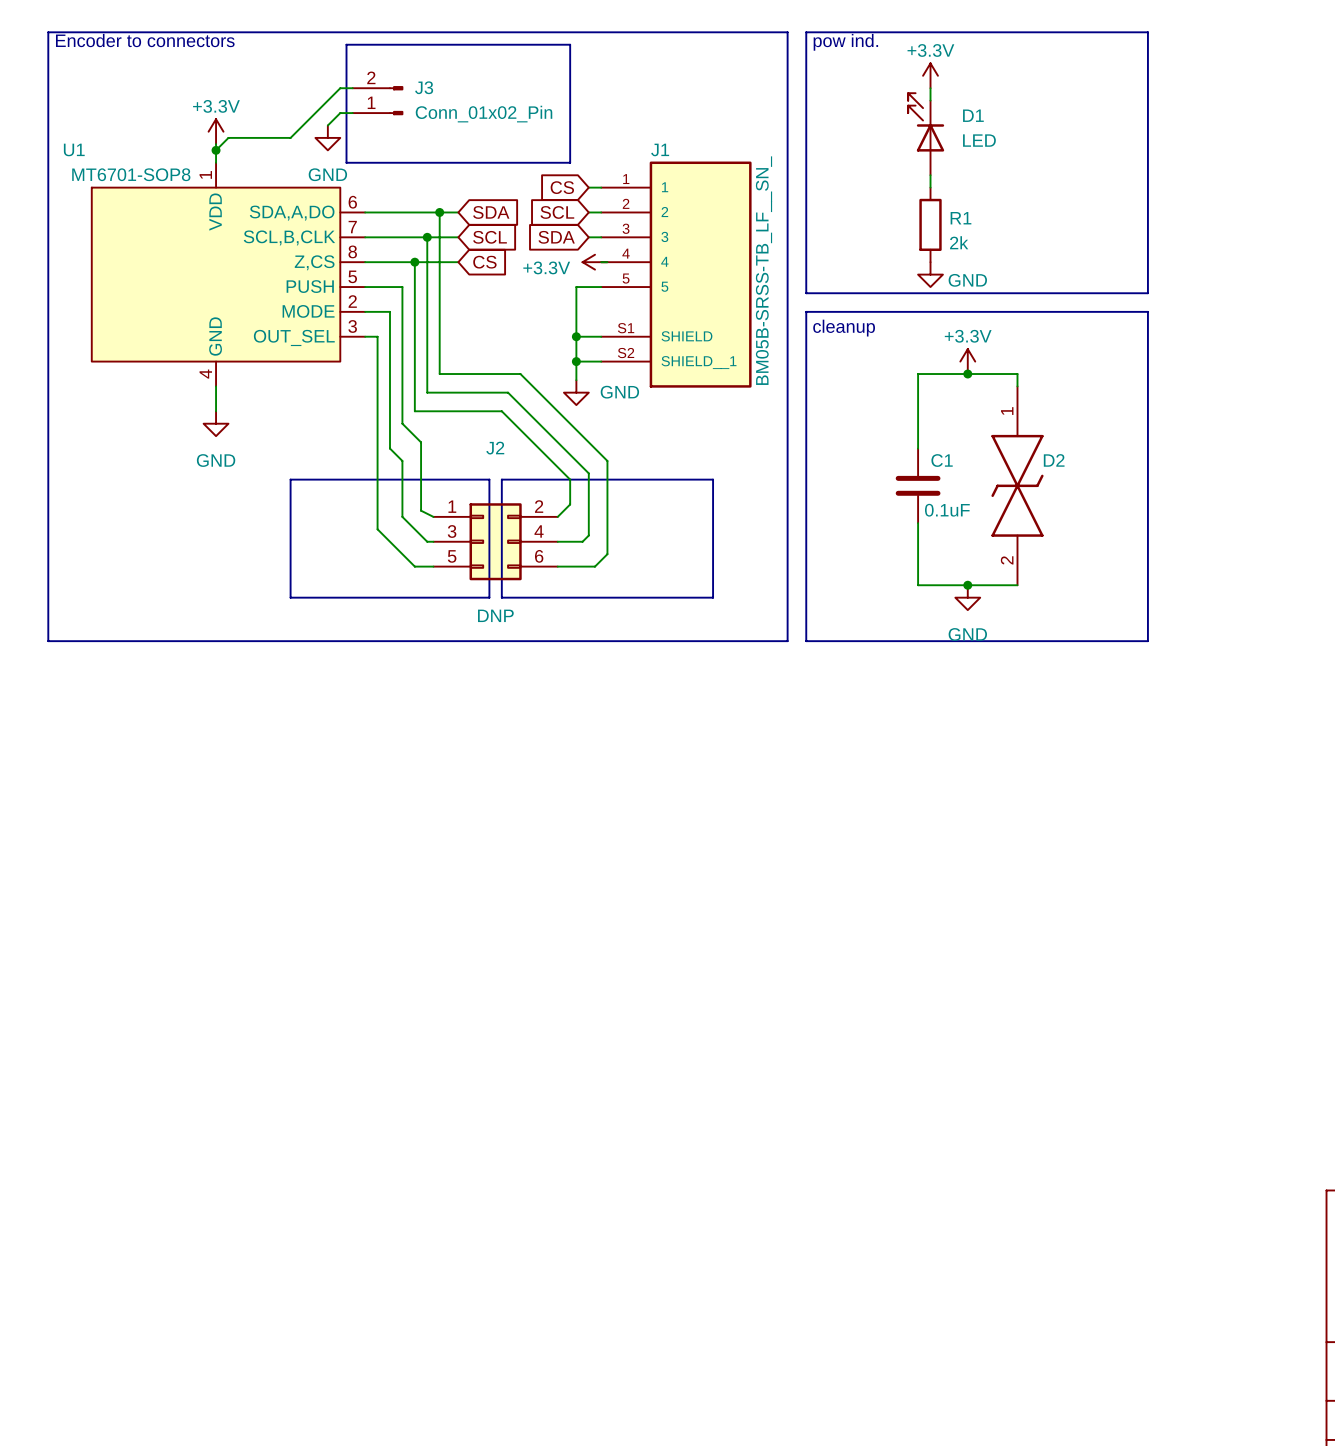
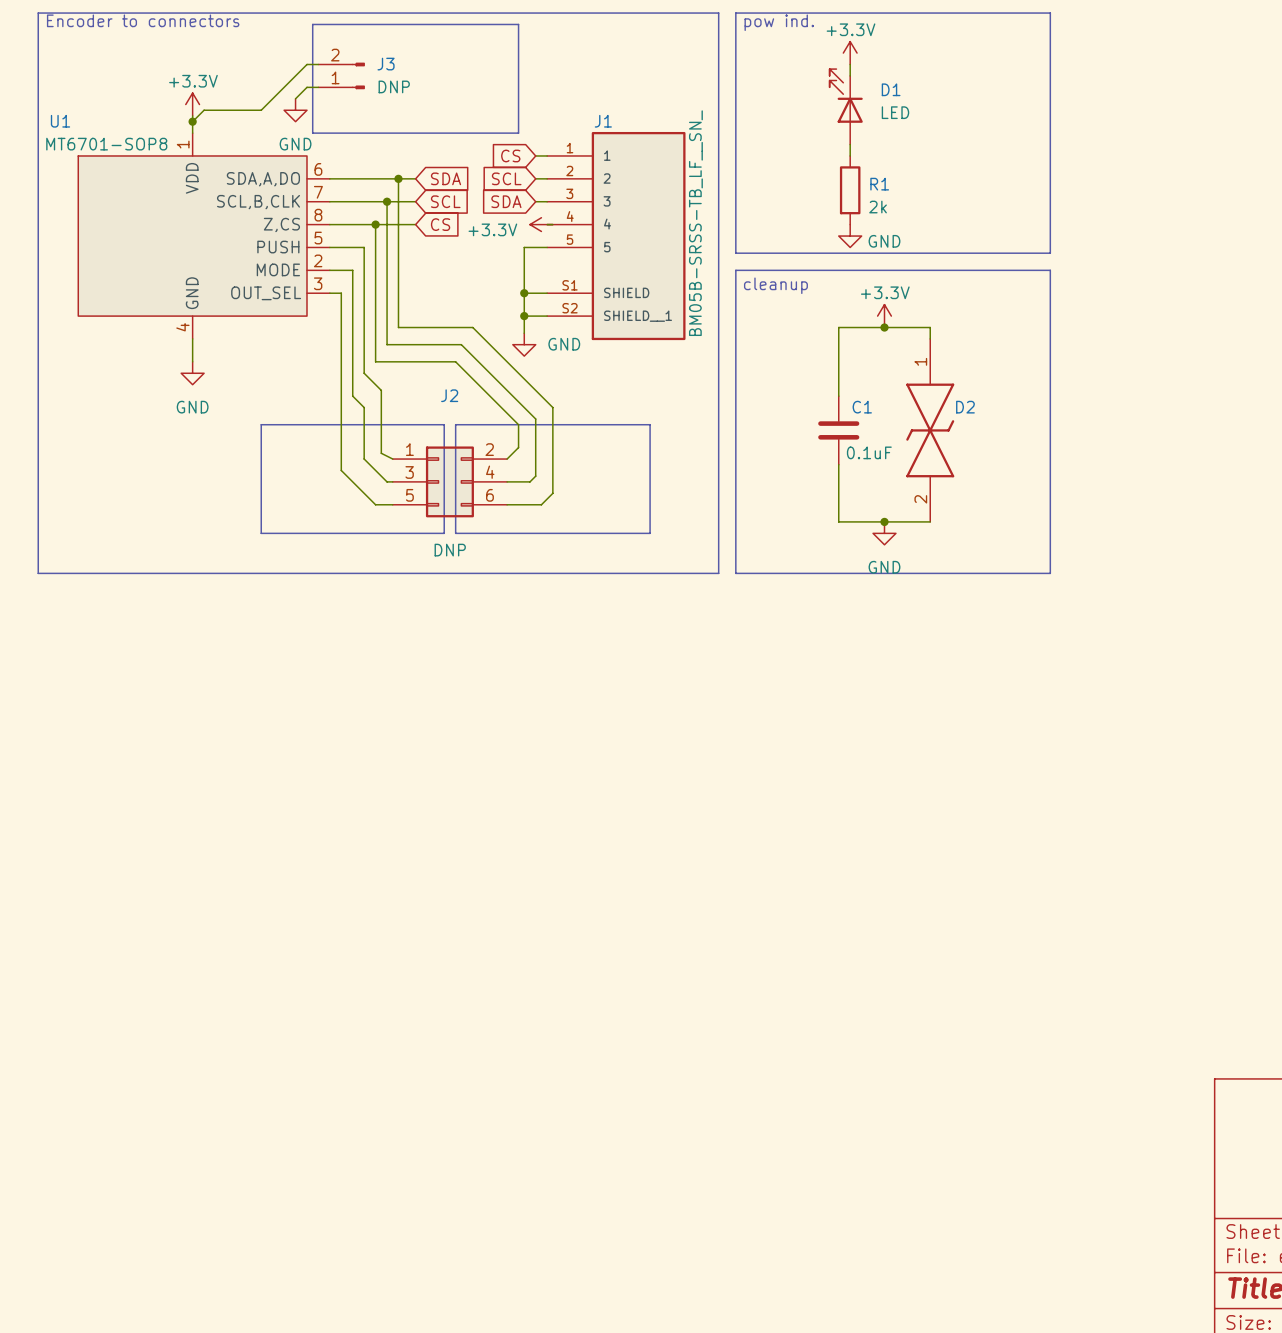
J3 value: Conn_01x02_Pin (484, 114) -> DNP (394, 86)

